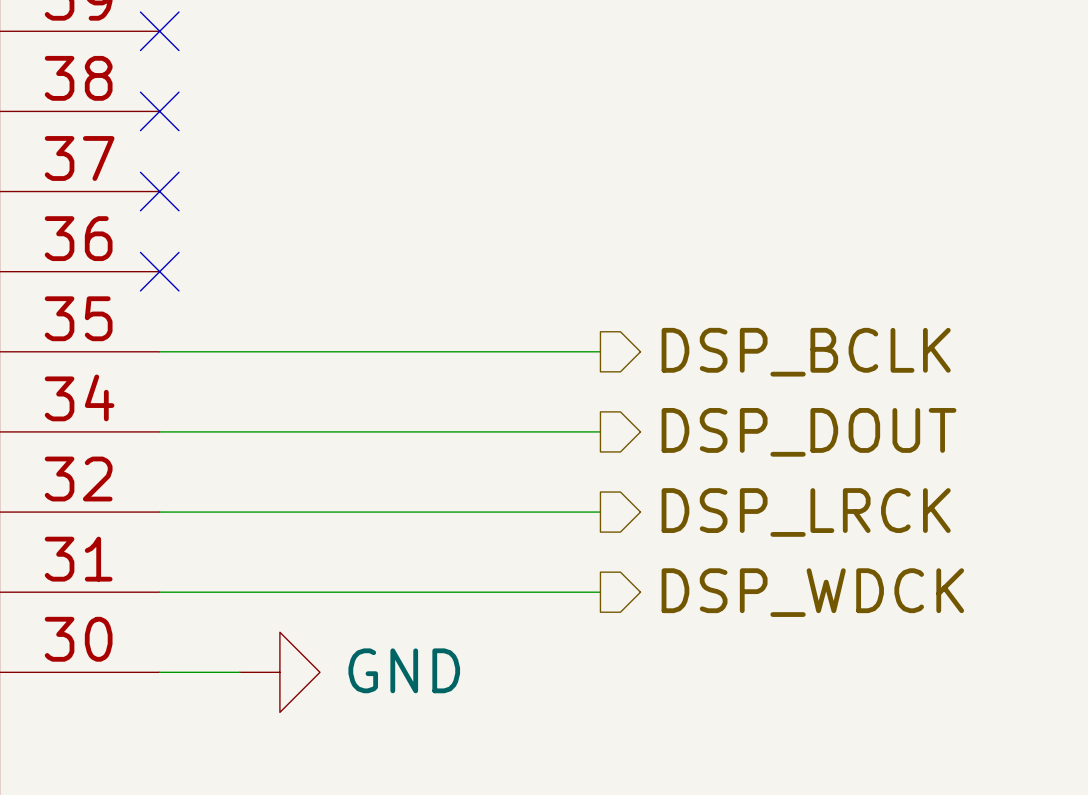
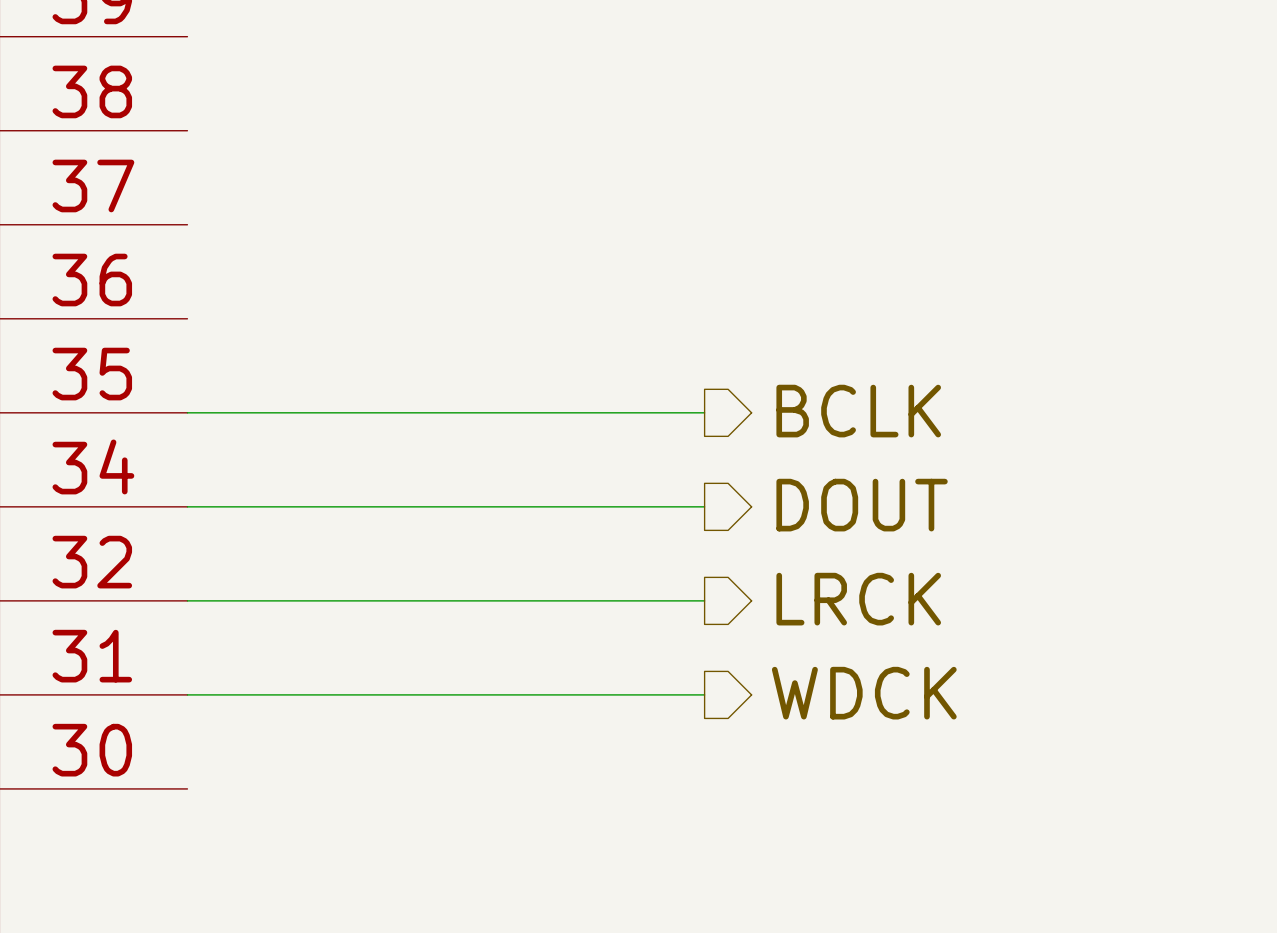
no-connect mark: (159, 31) -> none
no-connect mark: (159, 111) -> none
no-connect mark: (159, 191) -> none
no-connect mark: (159, 271) -> none
hierarchical label: DSP_BCLK (806, 352) -> BCLK (858, 411)
hierarchical label: DSP_DOUT (809, 432) -> DOUT (862, 505)
hierarchical label: DSP_LRCK (806, 512) -> LRCK (858, 599)
hierarchical label: DSP_WDCK (812, 592) -> WDCK (864, 693)
wire: (159, 672) (239, 672) -> none
power symbol: GND (279, 672) -> none

